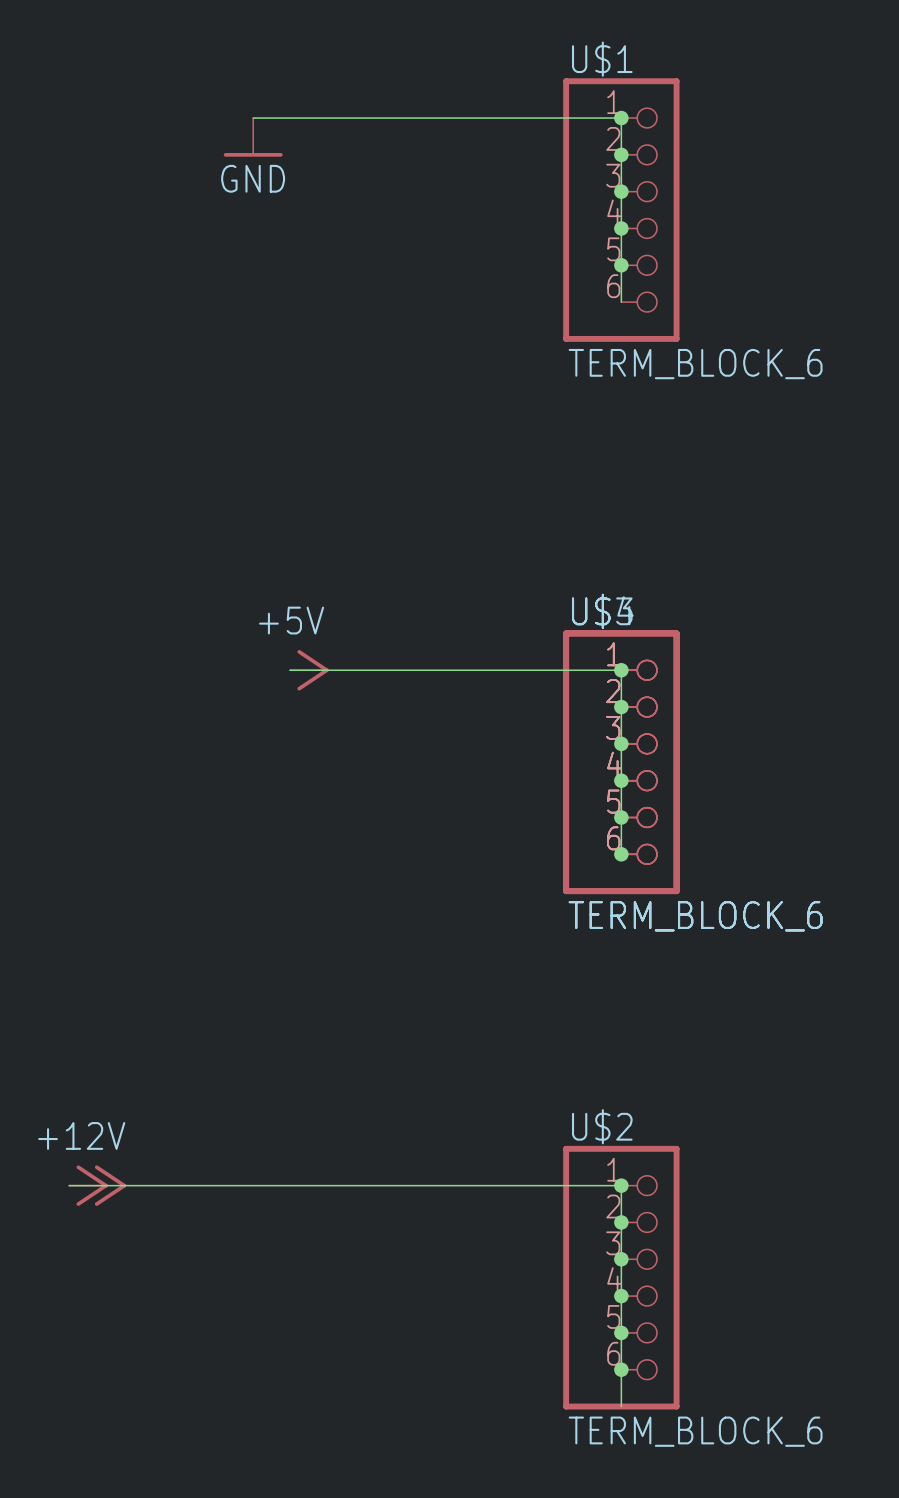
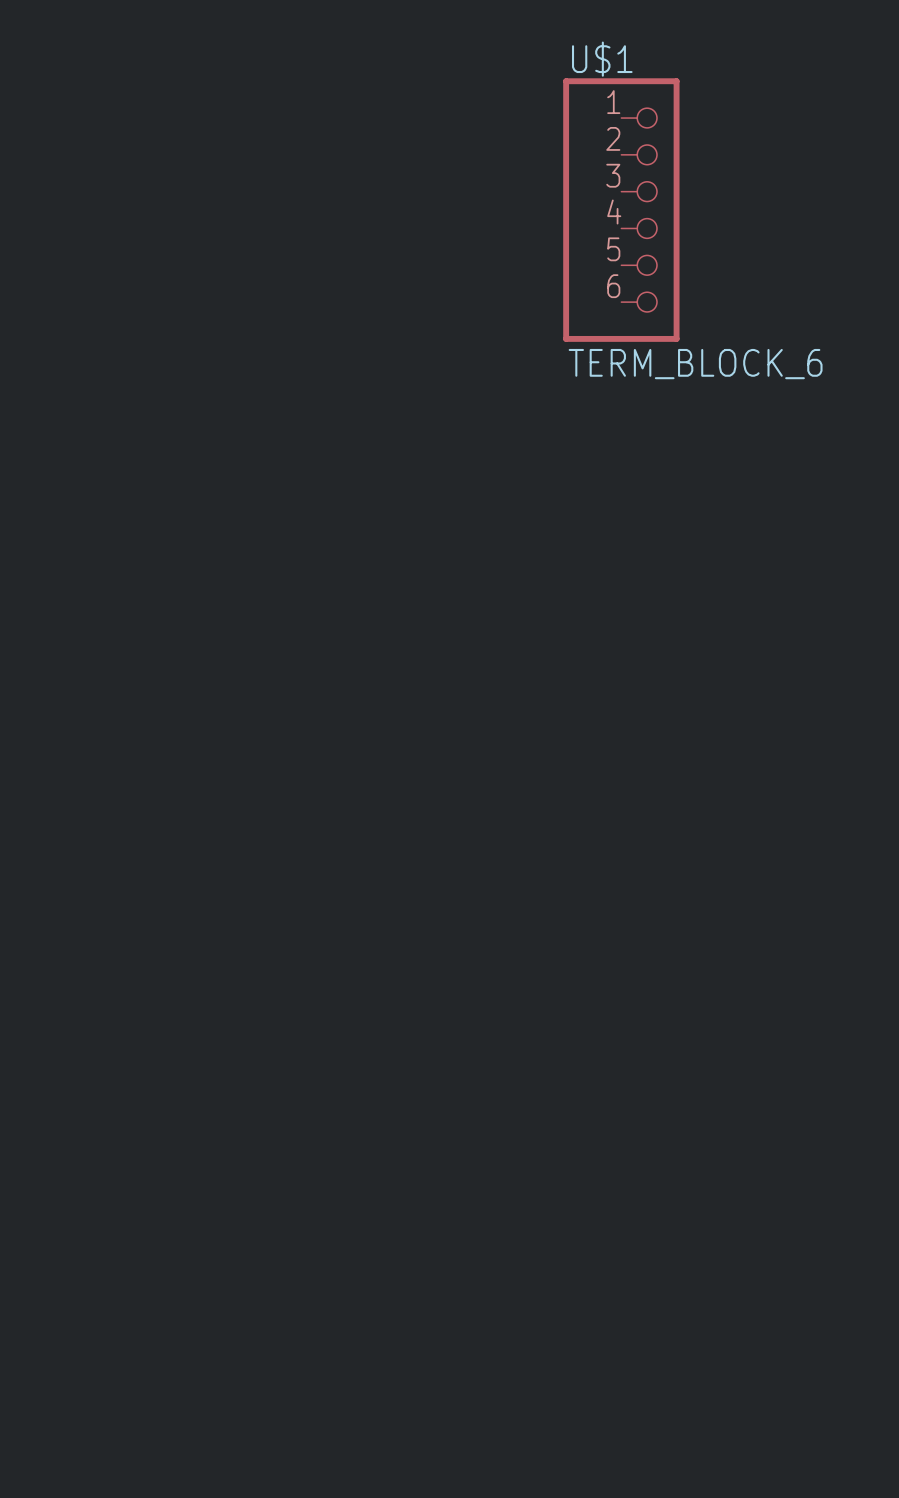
wire: (253, 118) (621, 118) (621, 302) -> none
junction: (621, 118) -> none
power symbol: GND (253, 137) -> none
junction: (621, 154) -> none
junction: (621, 191) -> none
junction: (621, 228) -> none
junction: (621, 265) -> none
wire: (290, 670) (621, 670) (621, 854) -> none
power symbol: +5V (309, 670) -> none
junction: (621, 670) -> none
junction: (621, 707) -> none
junction: (621, 743) -> none
part: TERM_BLOCK_6 (621, 762) -> none
part: TERM_BLOCK_6 (621, 762) -> none
junction: (621, 780) -> none
junction: (621, 817) -> none
junction: (621, 854) -> none
wire: (69, 1185) (621, 1185) (621, 1406) -> none
power symbol: +12V (97, 1185) -> none
junction: (621, 1185) -> none
junction: (621, 1222) -> none
junction: (621, 1259) -> none
U$2: TERM_BLOCK_6 (621, 1277) -> none
junction: (621, 1296) -> none
junction: (621, 1332) -> none
junction: (621, 1369) -> none

